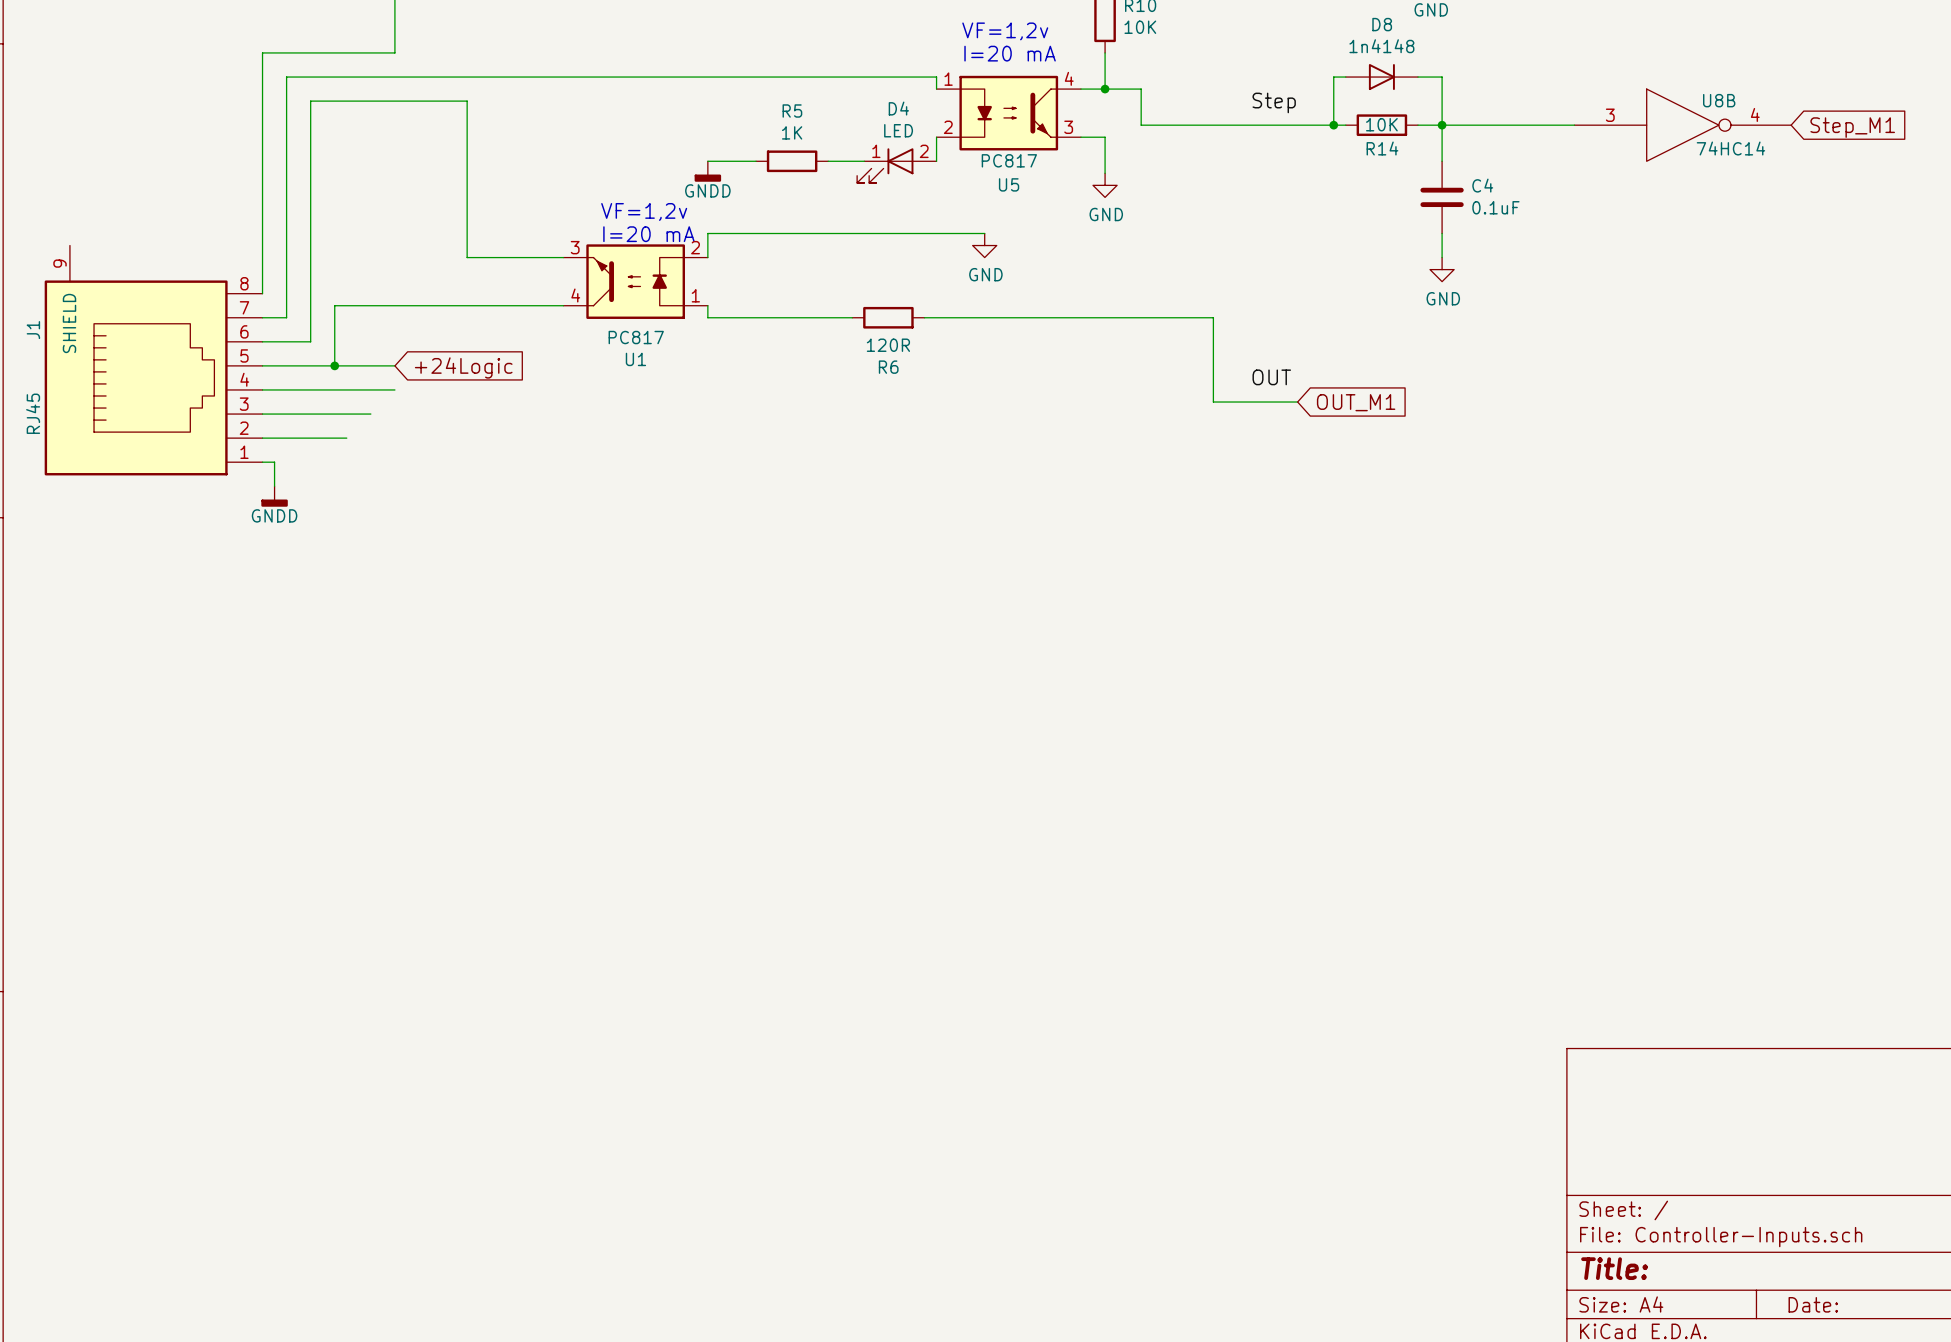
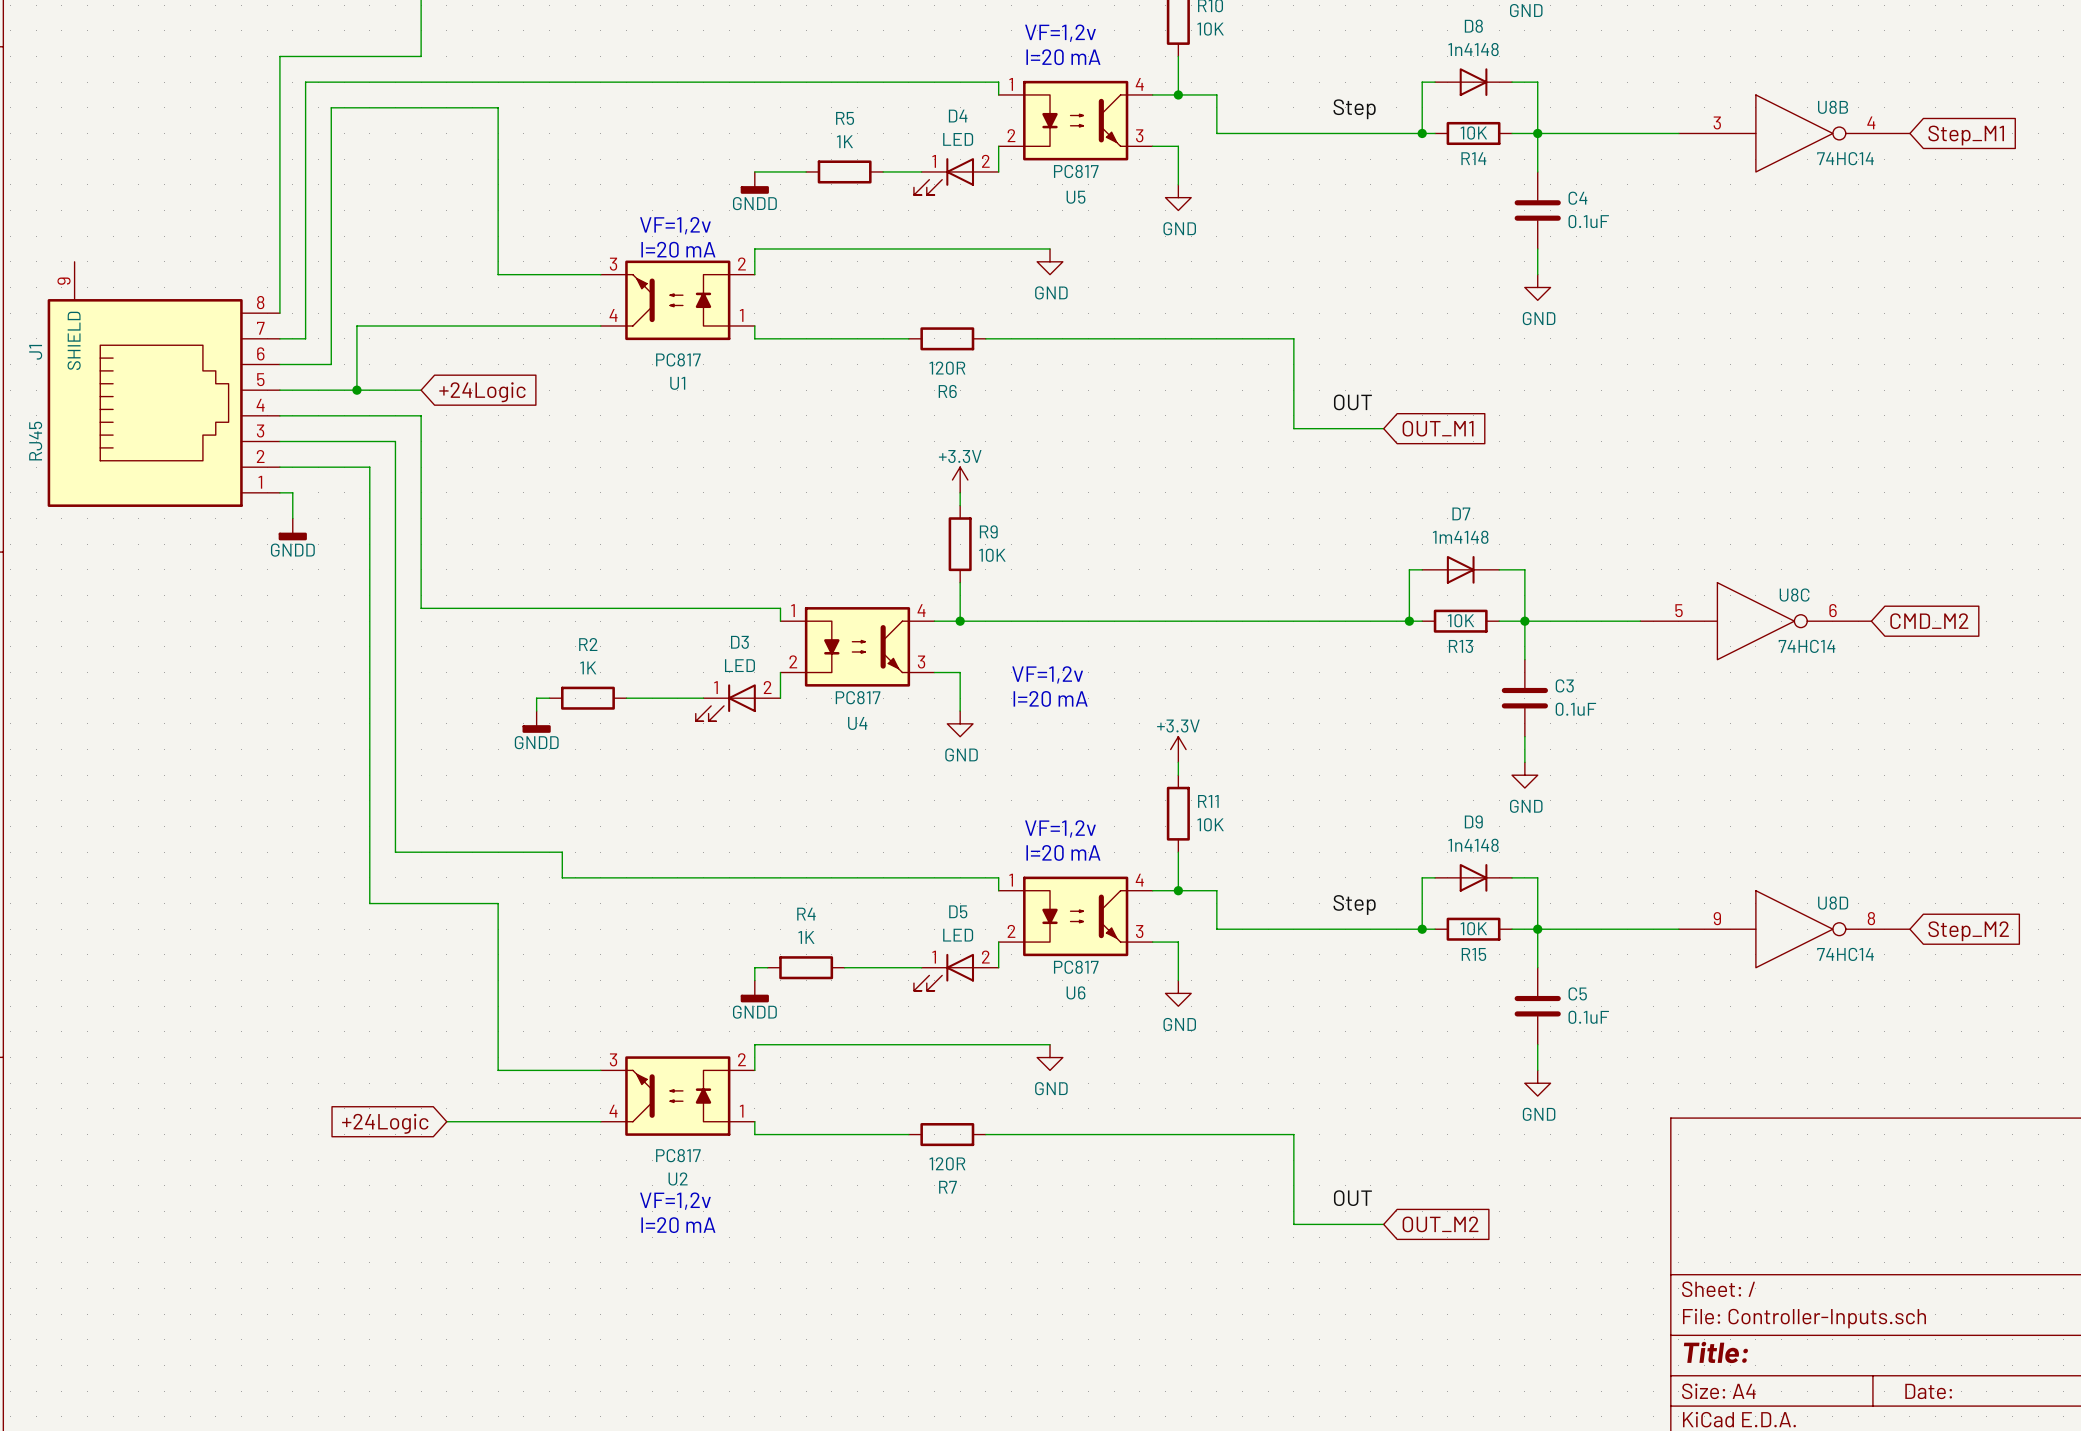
wire: none -> (421, 415) (421, 608) (780, 608) (780, 621)
wire: none -> (395, 441) (395, 852) (562, 852) (562, 877) (998, 877) (998, 890)
wire: none -> (369, 467) (369, 903) (498, 903) (498, 1070) (600, 1070)
power symbol: none -> +3.3V (960, 480)
wire: none -> (960, 492) (960, 505)
R9: none -> 10K (960, 544)
wire: none -> (1422, 569) (1409, 569) (1409, 621)
D7: none -> 1m4148 (1460, 569)
wire: none -> (1499, 569) (1524, 569) (1524, 659)
wire: none -> (960, 582) (960, 621)
wire: none -> (934, 621) (1422, 621)
junction: none -> (960, 621)
junction: none -> (1409, 621)
R13: none -> 10K (1460, 621)
wire: none -> (1499, 621) (1640, 621)
junction: none -> (1524, 621)
U8C: none -> 74HC14 (1755, 621)
global label: none -> CMD_M2 (1929, 621)
U4: none -> PC817 (857, 646)
wire: none -> (780, 672) (780, 698)
wire: none -> (934, 672) (960, 672) (960, 711)
text: none -> VF=1,2v (1047, 674)
wire: none -> (549, 698) (536, 698) (536, 711)
R2: none -> 1K (587, 698)
wire: none -> (626, 698) (703, 698)
C3: none -> 0.1uF (1524, 698)
text: none -> I=20 mA (1050, 698)
D3: none -> LED (738, 702)
power symbol: none -> GNDD (536, 721)
power symbol: none -> GND (960, 723)
wire: none -> (1524, 736) (1524, 762)
power symbol: none -> +3.3V (1178, 749)
wire: none -> (1178, 762) (1178, 775)
power symbol: none -> GND (1524, 775)
R11: none -> 10K (1178, 813)
text: none -> VF=1,2v (1060, 828)
text: none -> I=20 mA (1063, 852)
wire: none -> (1178, 852) (1178, 890)
wire: none -> (1435, 877) (1422, 877) (1422, 929)
D9: none -> 1n4148 (1473, 877)
wire: none -> (1512, 877) (1537, 877) (1537, 967)
wire: none -> (1152, 890) (1216, 890) (1216, 929) (1435, 929)
junction: none -> (1178, 890)
label: none -> Step (1354, 904)
U6: none -> PC817 (1075, 916)
junction: none -> (1422, 929)
R15: none -> 10K (1473, 929)
wire: none -> (1512, 929) (1678, 929)
junction: none -> (1537, 929)
U8D: none -> 74HC14 (1794, 929)
global label: none -> Step_M2 (1968, 931)
wire: none -> (998, 942) (998, 967)
wire: none -> (1152, 942) (1178, 942) (1178, 980)
wire: none -> (767, 967) (754, 967) (754, 980)
R4: none -> 1K (806, 967)
wire: none -> (844, 967) (921, 967)
D5: none -> LED (956, 972)
power symbol: none -> GNDD (754, 991)
power symbol: none -> GND (1178, 993)
C5: none -> 0.1uF (1537, 1006)
wire: none -> (1050, 1044) (754, 1044) (754, 1070)
wire: none -> (1537, 1044) (1537, 1070)
power symbol: none -> GND (1050, 1057)
power symbol: none -> GND (1537, 1083)
U2: none -> PC817 (677, 1096)
wire: none -> (446, 1121) (600, 1121)
wire: none -> (754, 1121) (754, 1134) (908, 1134)
global label: none -> +24Logic (385, 1123)
R7: none -> 120R (947, 1134)
wire: none -> (985, 1134) (1293, 1134) (1293, 1224) (1383, 1224)
label: none -> OUT (1352, 1198)
text: none -> VF=1,2v (675, 1201)
text: none -> I=20 mA (678, 1225)
global label: none -> OUT_M2 (1440, 1224)

